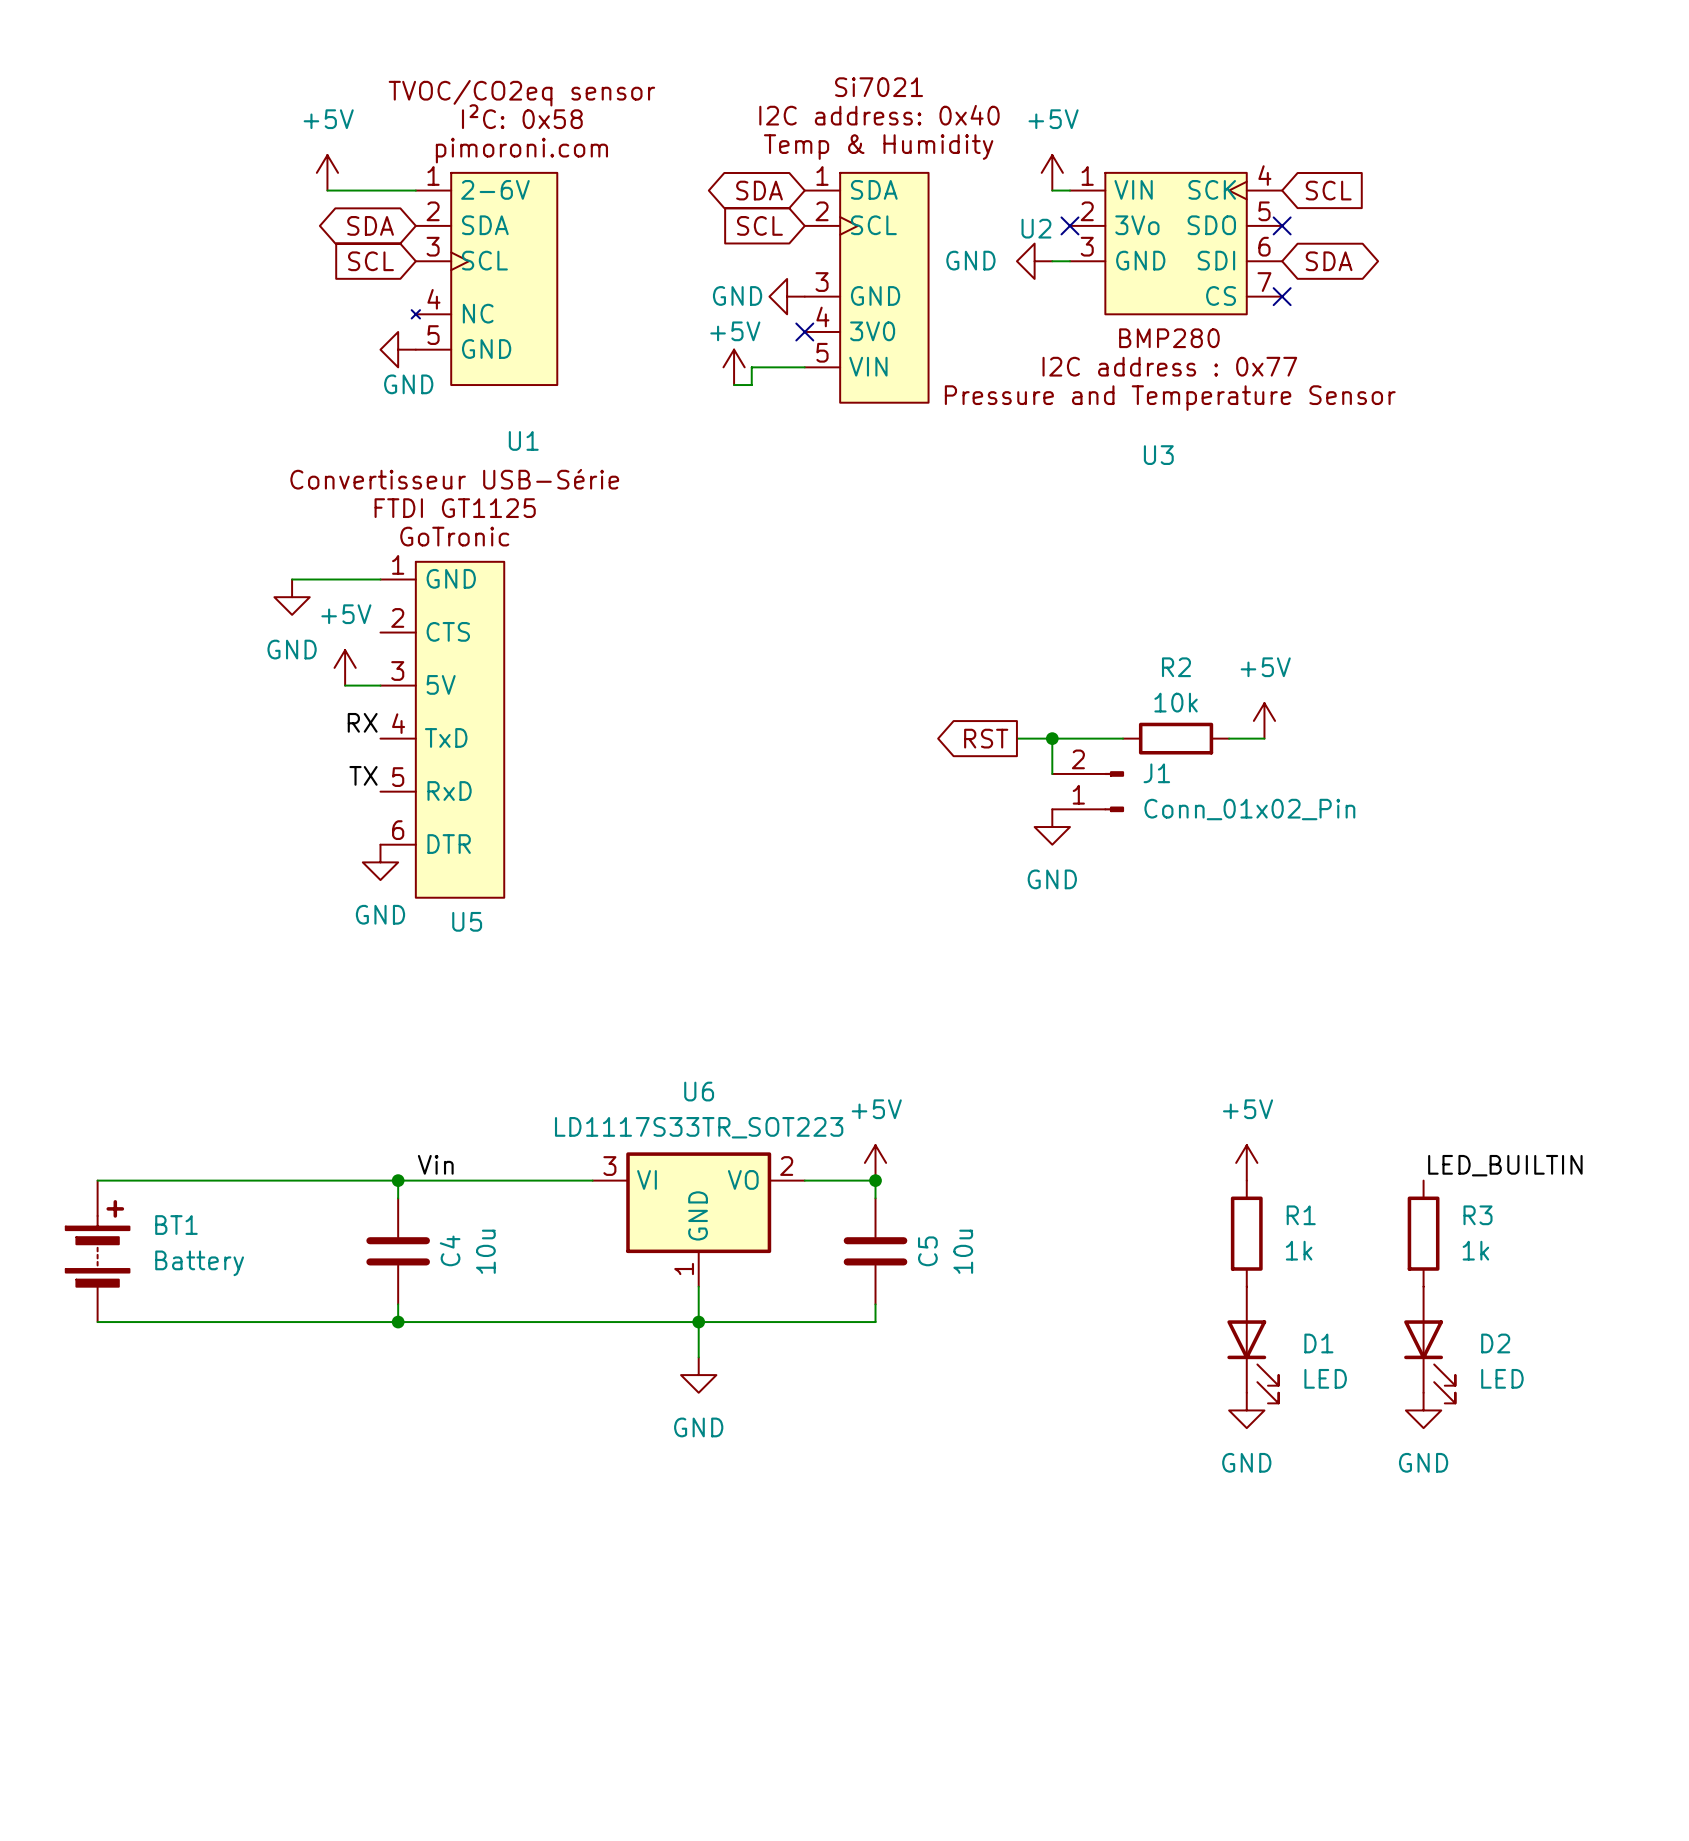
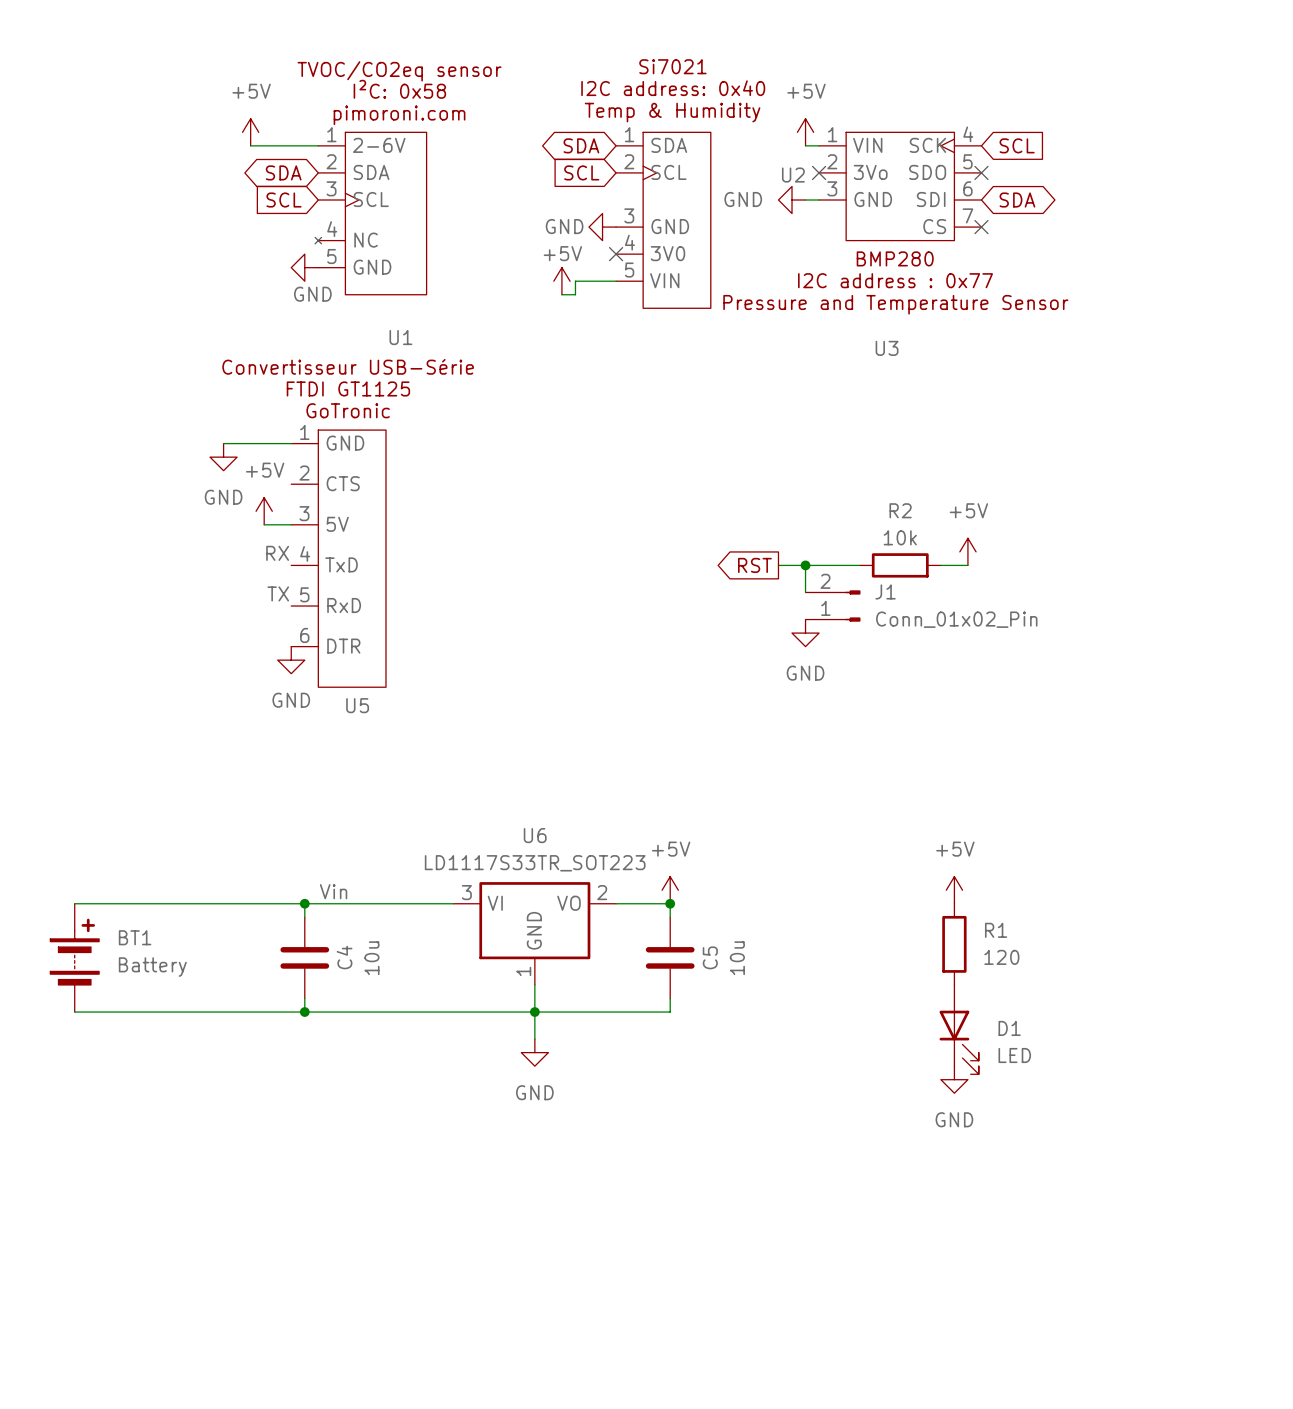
label: LED_BUILTIN (1505, 1165) -> none
R3: 1k (1423, 1233) -> none
R1 value: 1k (1299, 1250) -> 120 (1001, 957)
D2: LED (1429, 1345) -> none
power symbol: GND (1423, 1410) -> none

